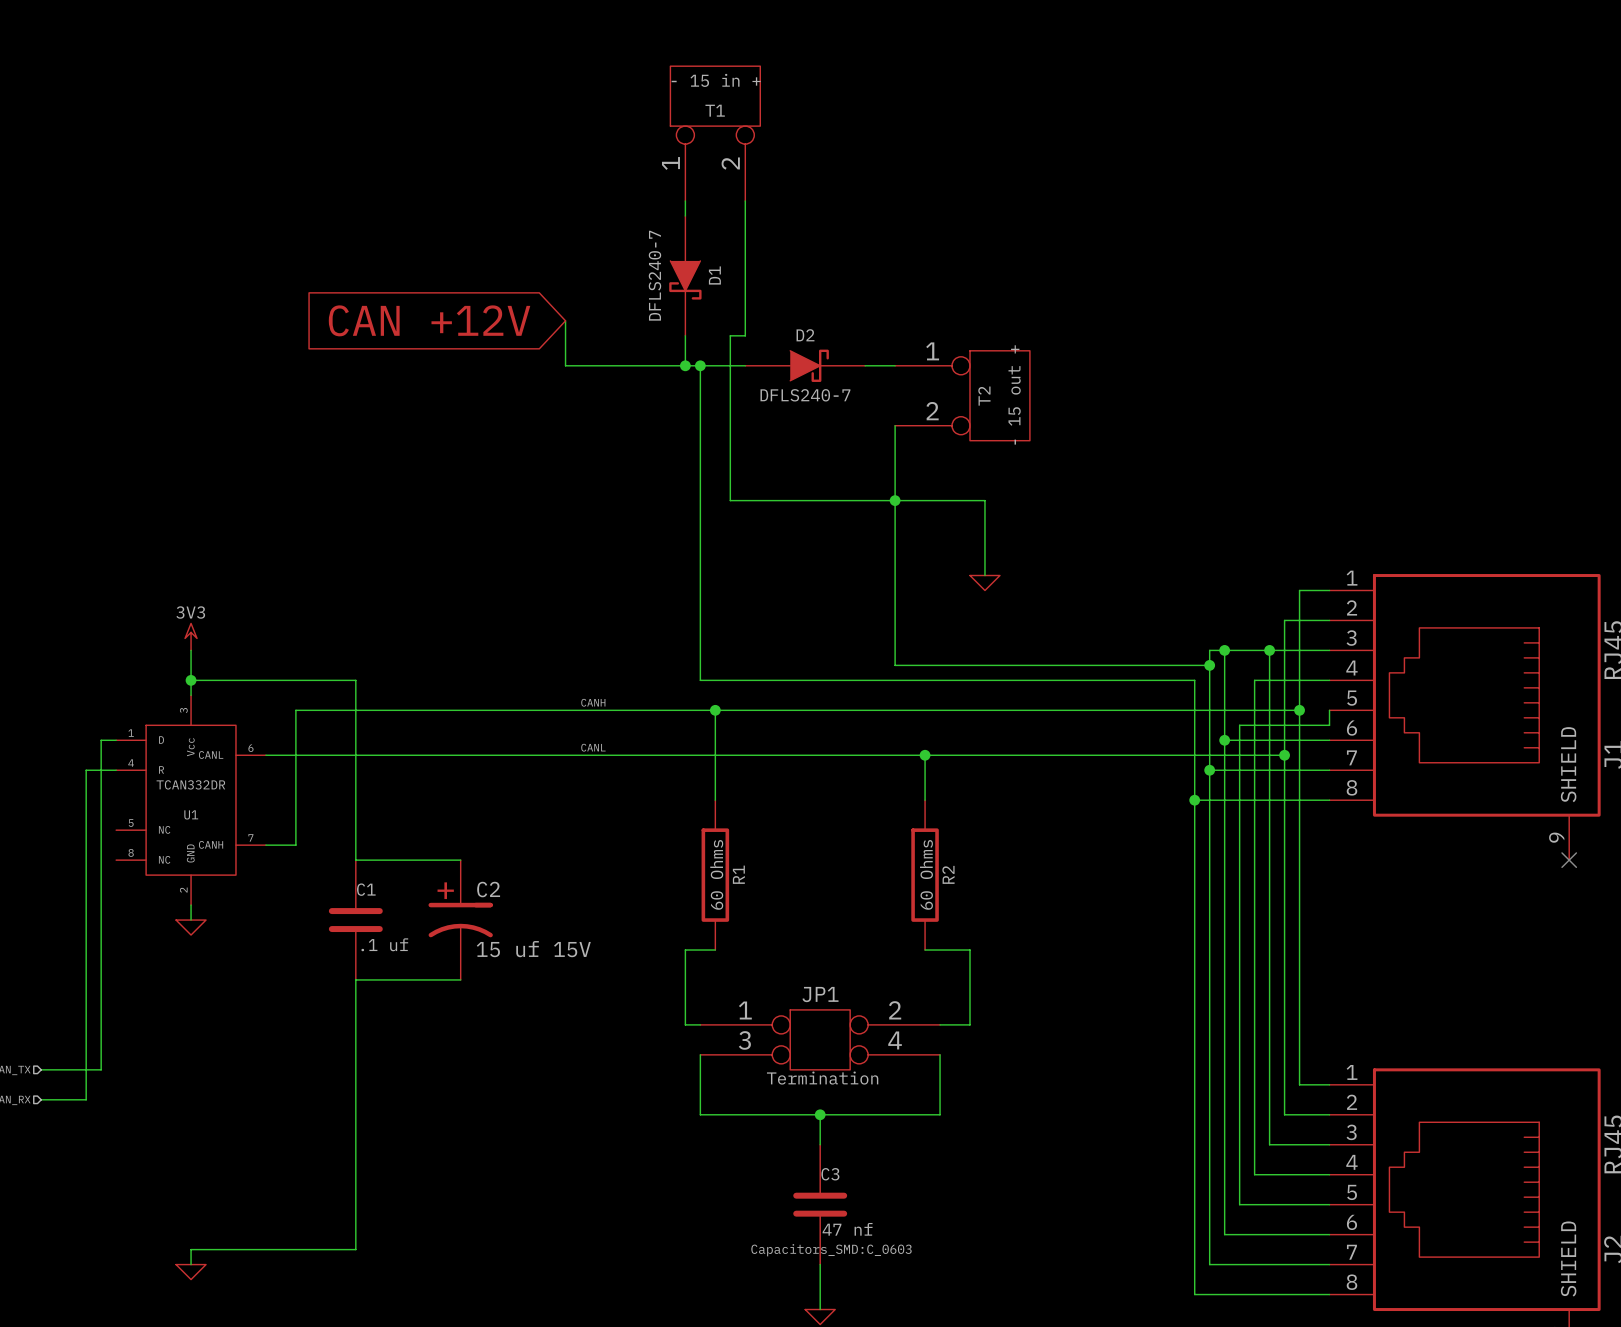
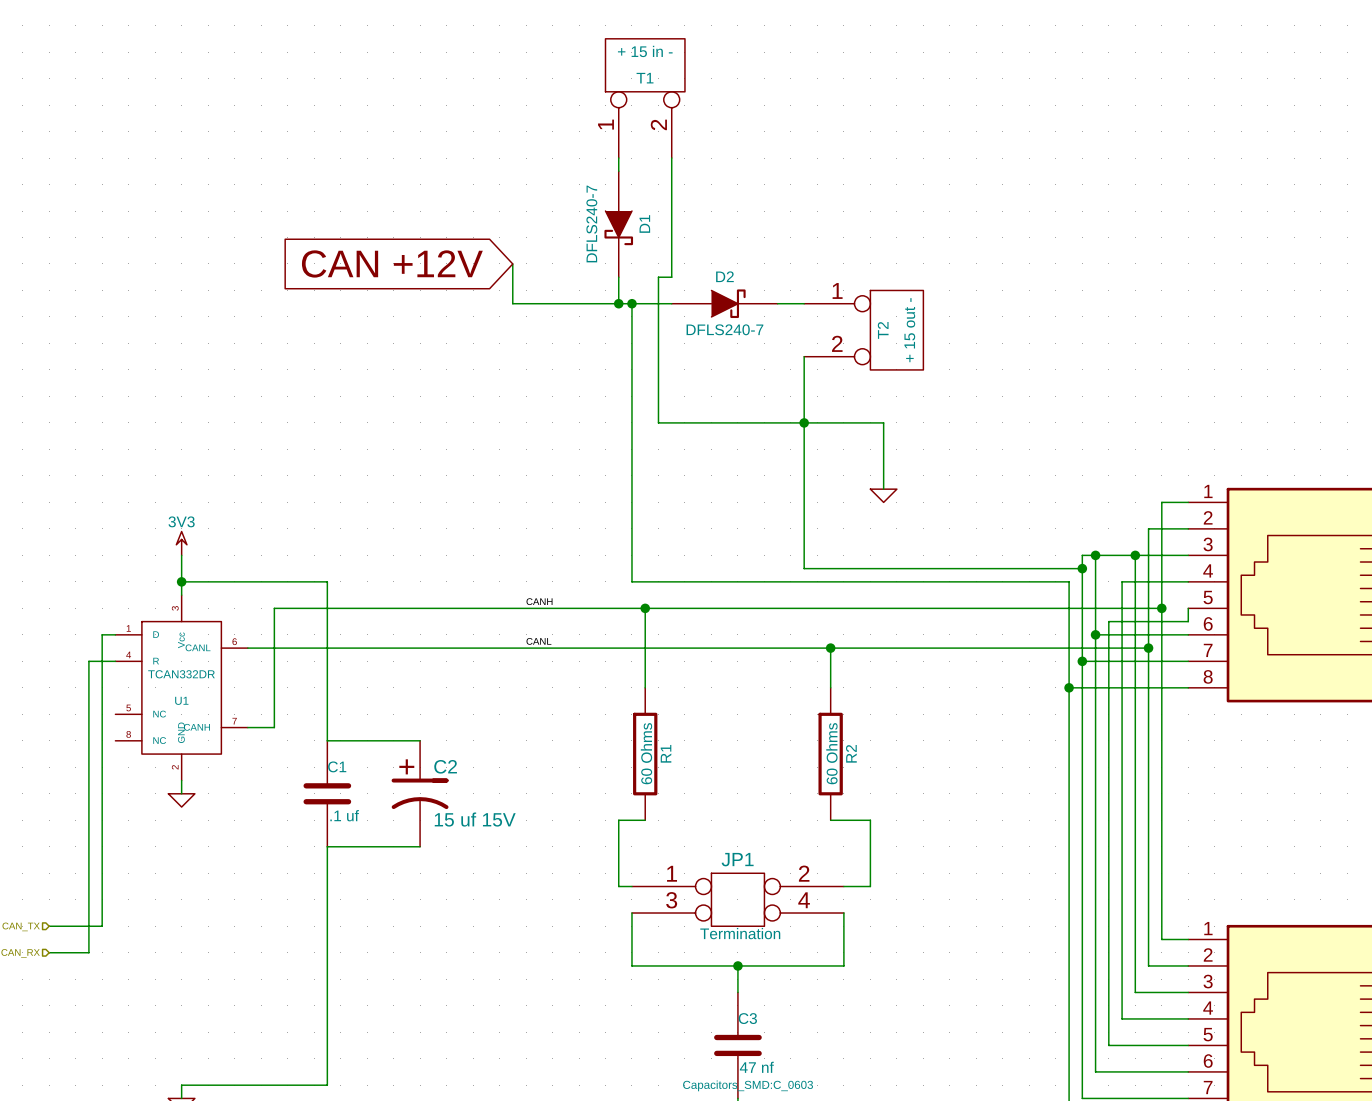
T1 value: - 15 in + (716, 80) -> + 15 in - (645, 51)
T2 value: - 15 out + (1014, 394) -> + 15 out - (909, 330)

